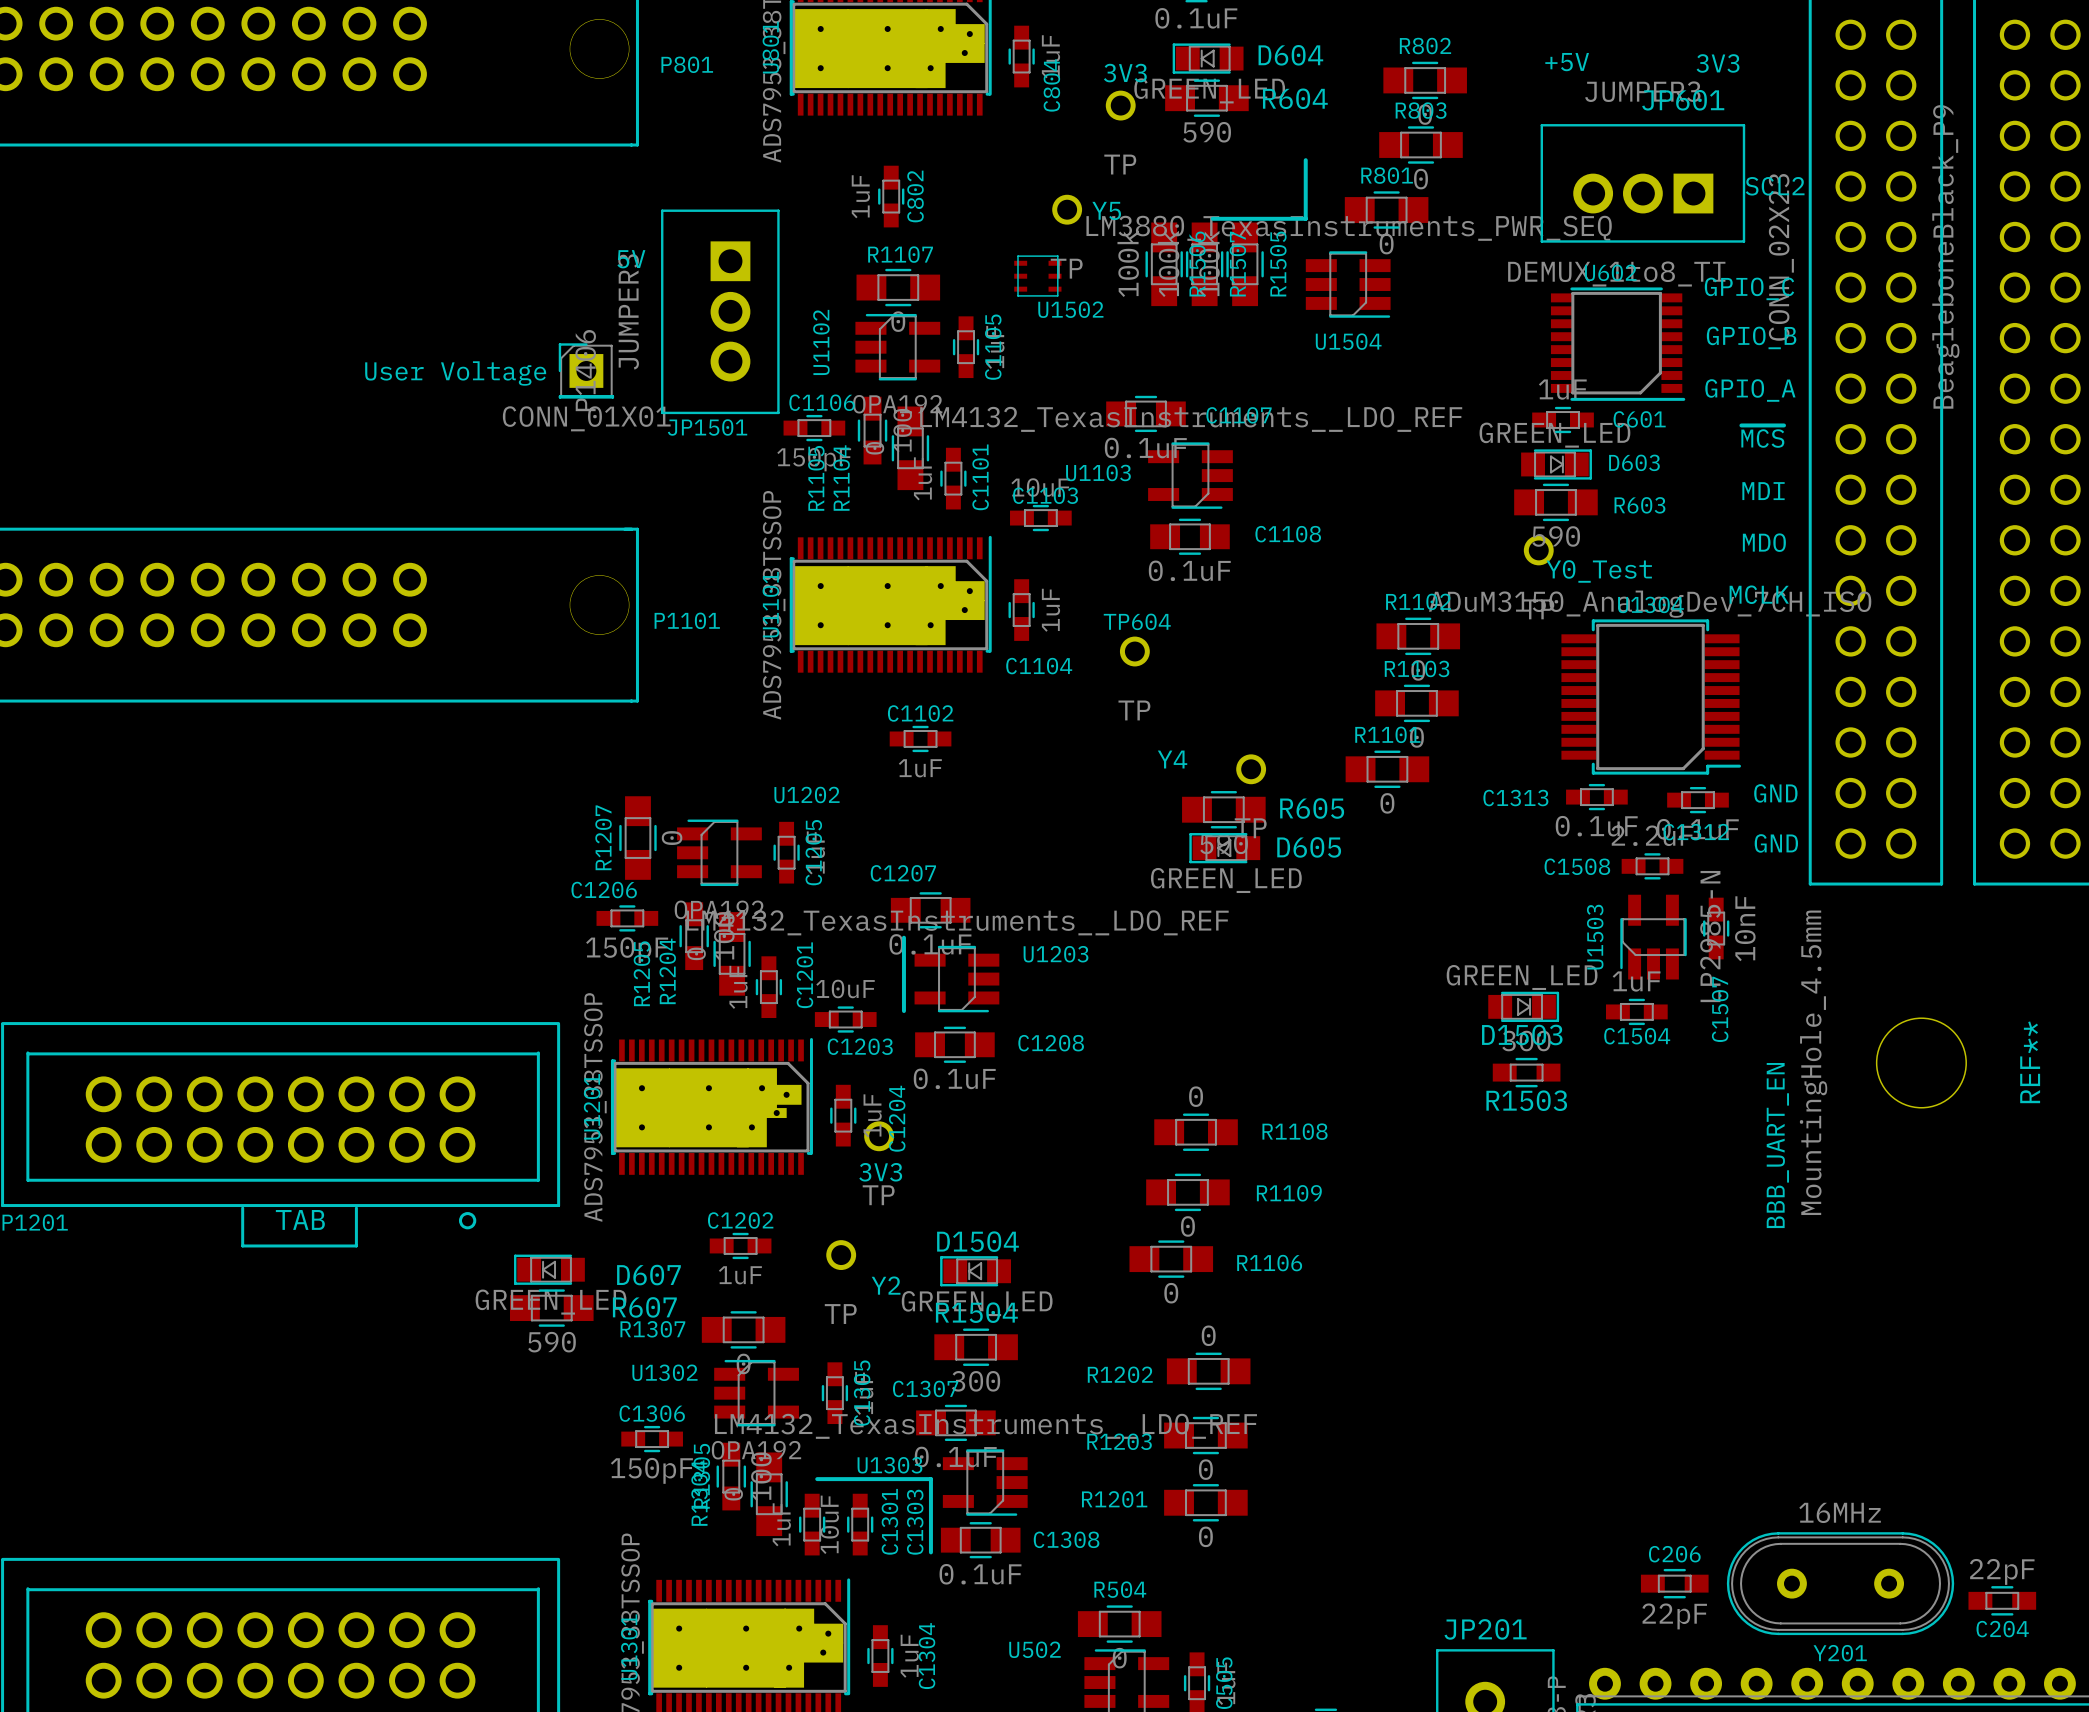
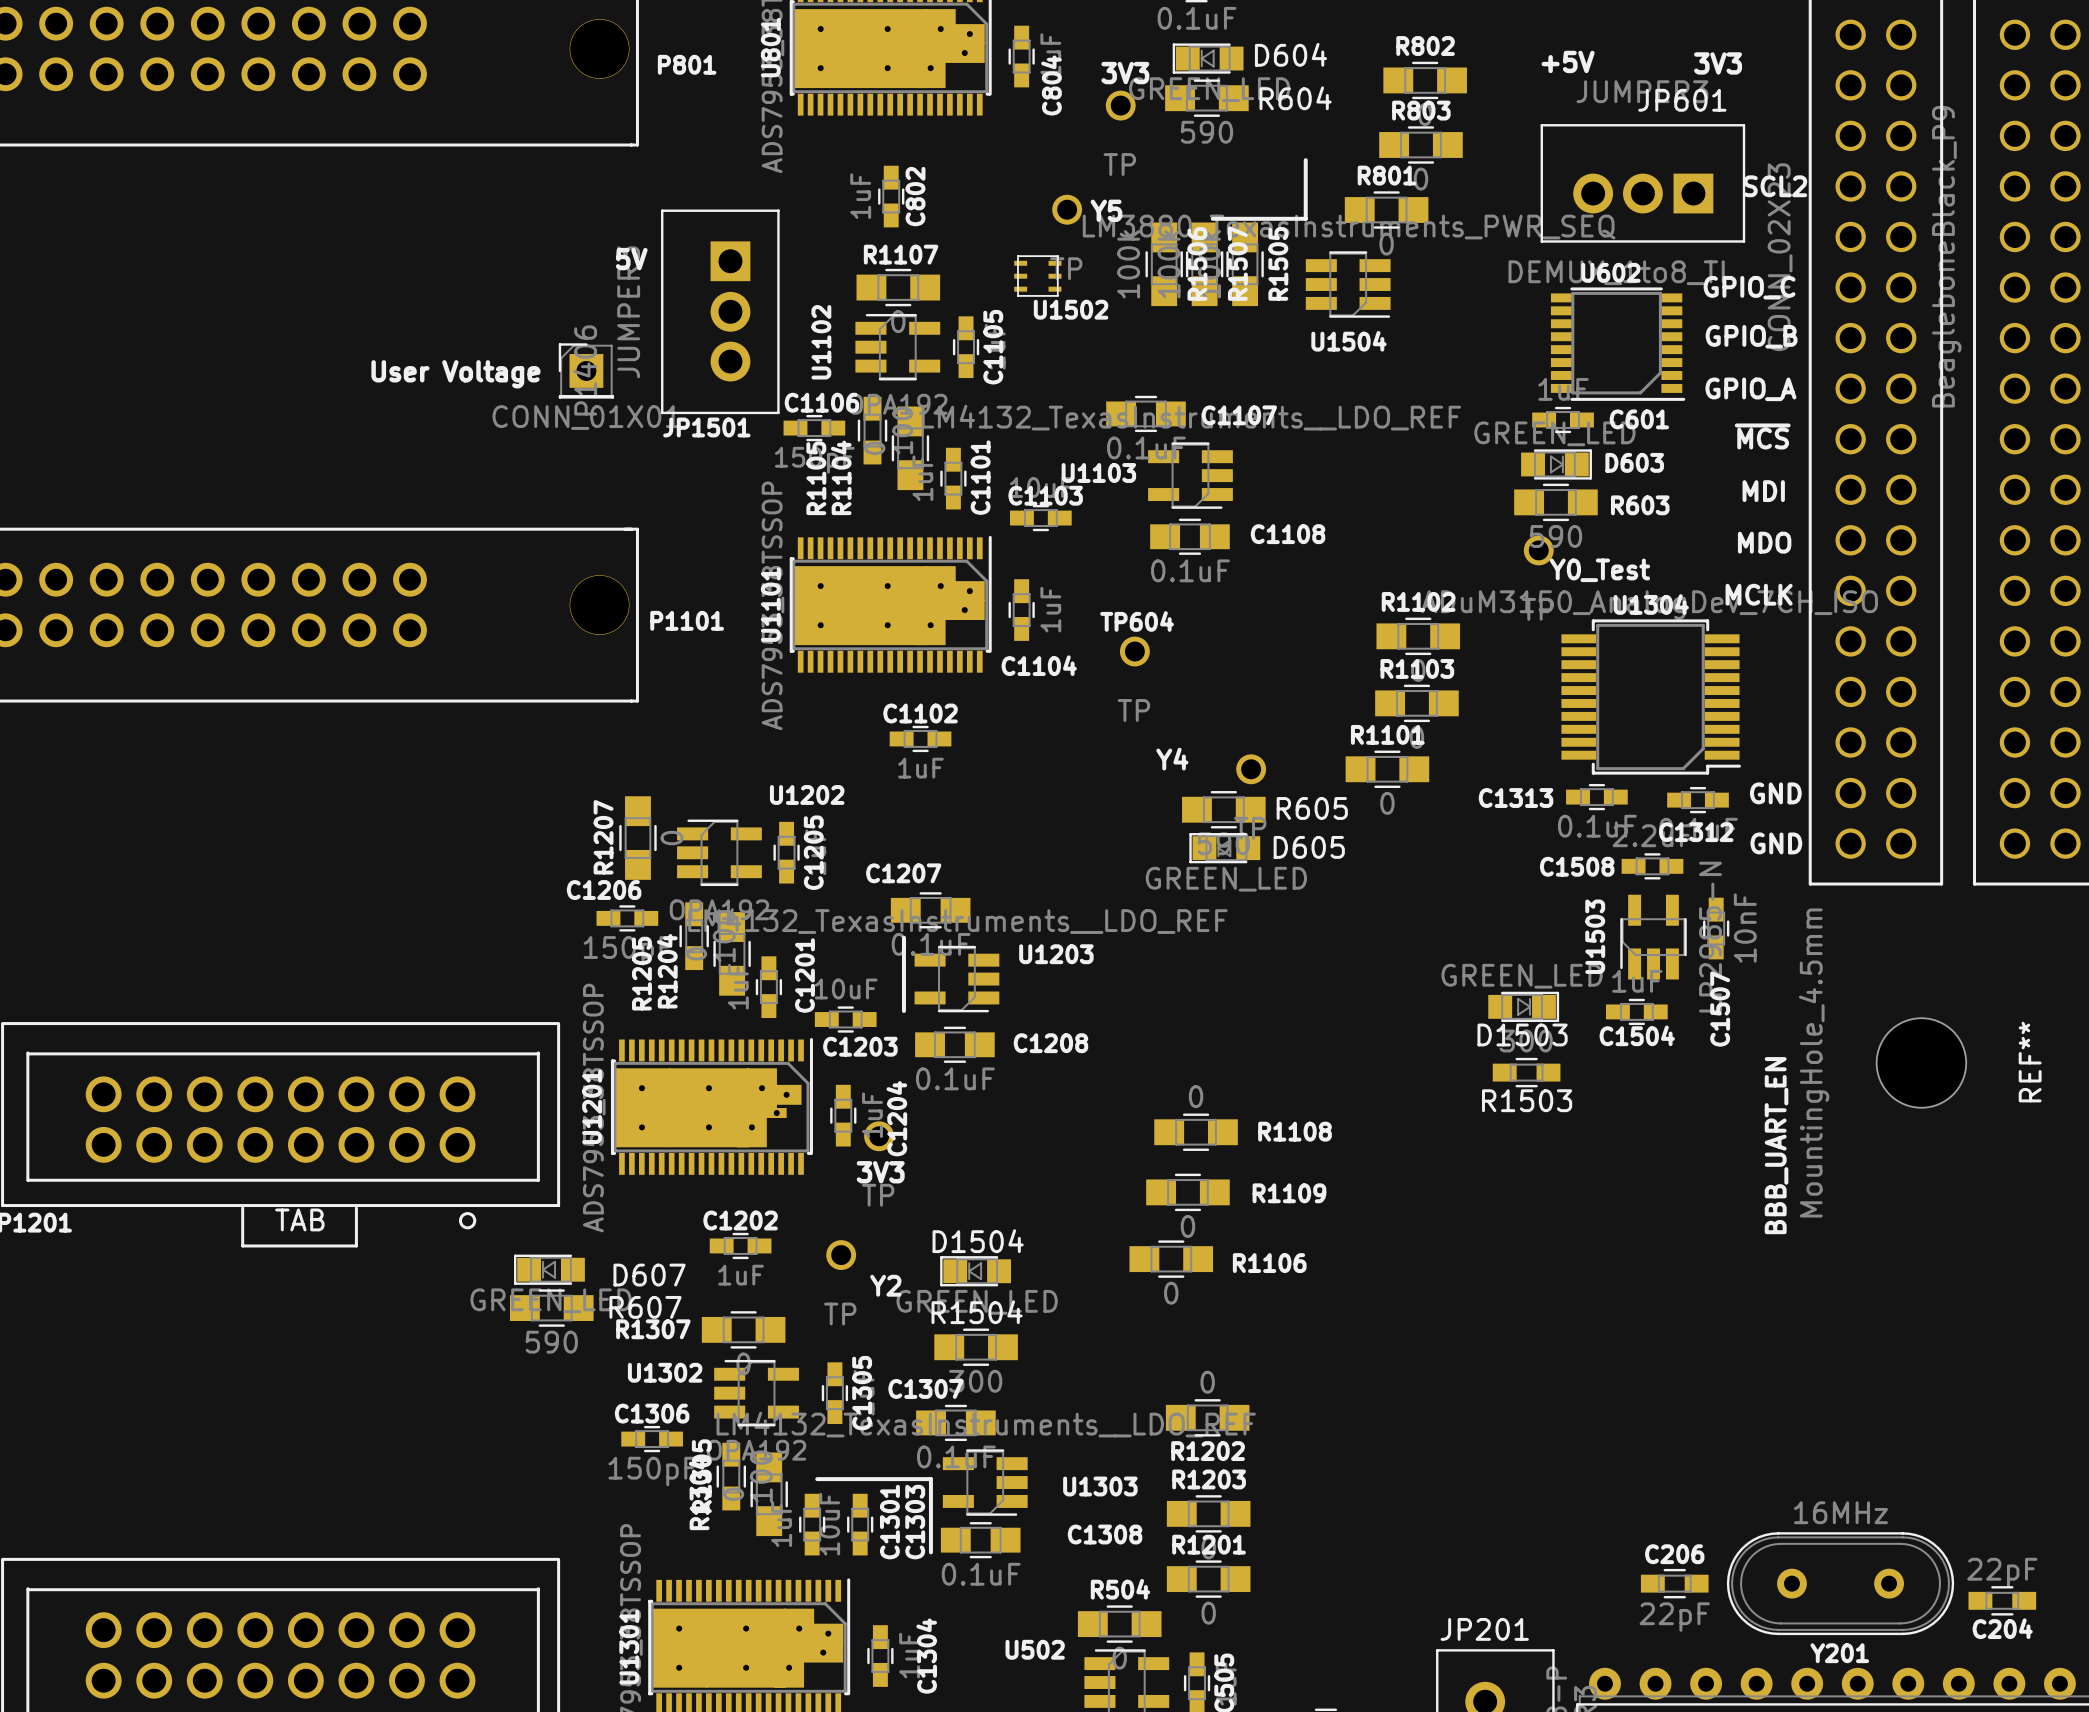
R1202 position: (1208, 1371) -> (1207, 1417)
R1202 name position: R1202 (1120, 1374) -> R1202 (1208, 1451)
R1203 position: (1205, 1435) -> (1208, 1513)
R1203 name position: R1203 (1119, 1441) -> R1203 (1209, 1479)
U1303 name position: U1303 (889, 1465) -> U1303 (1100, 1486)
R1201 name position: R1201 (1114, 1499) -> R1201 (1209, 1544)
R1201 position: (1205, 1502) -> (1208, 1579)
C1308 name position: C1308 (1066, 1539) -> C1308 (1105, 1534)

